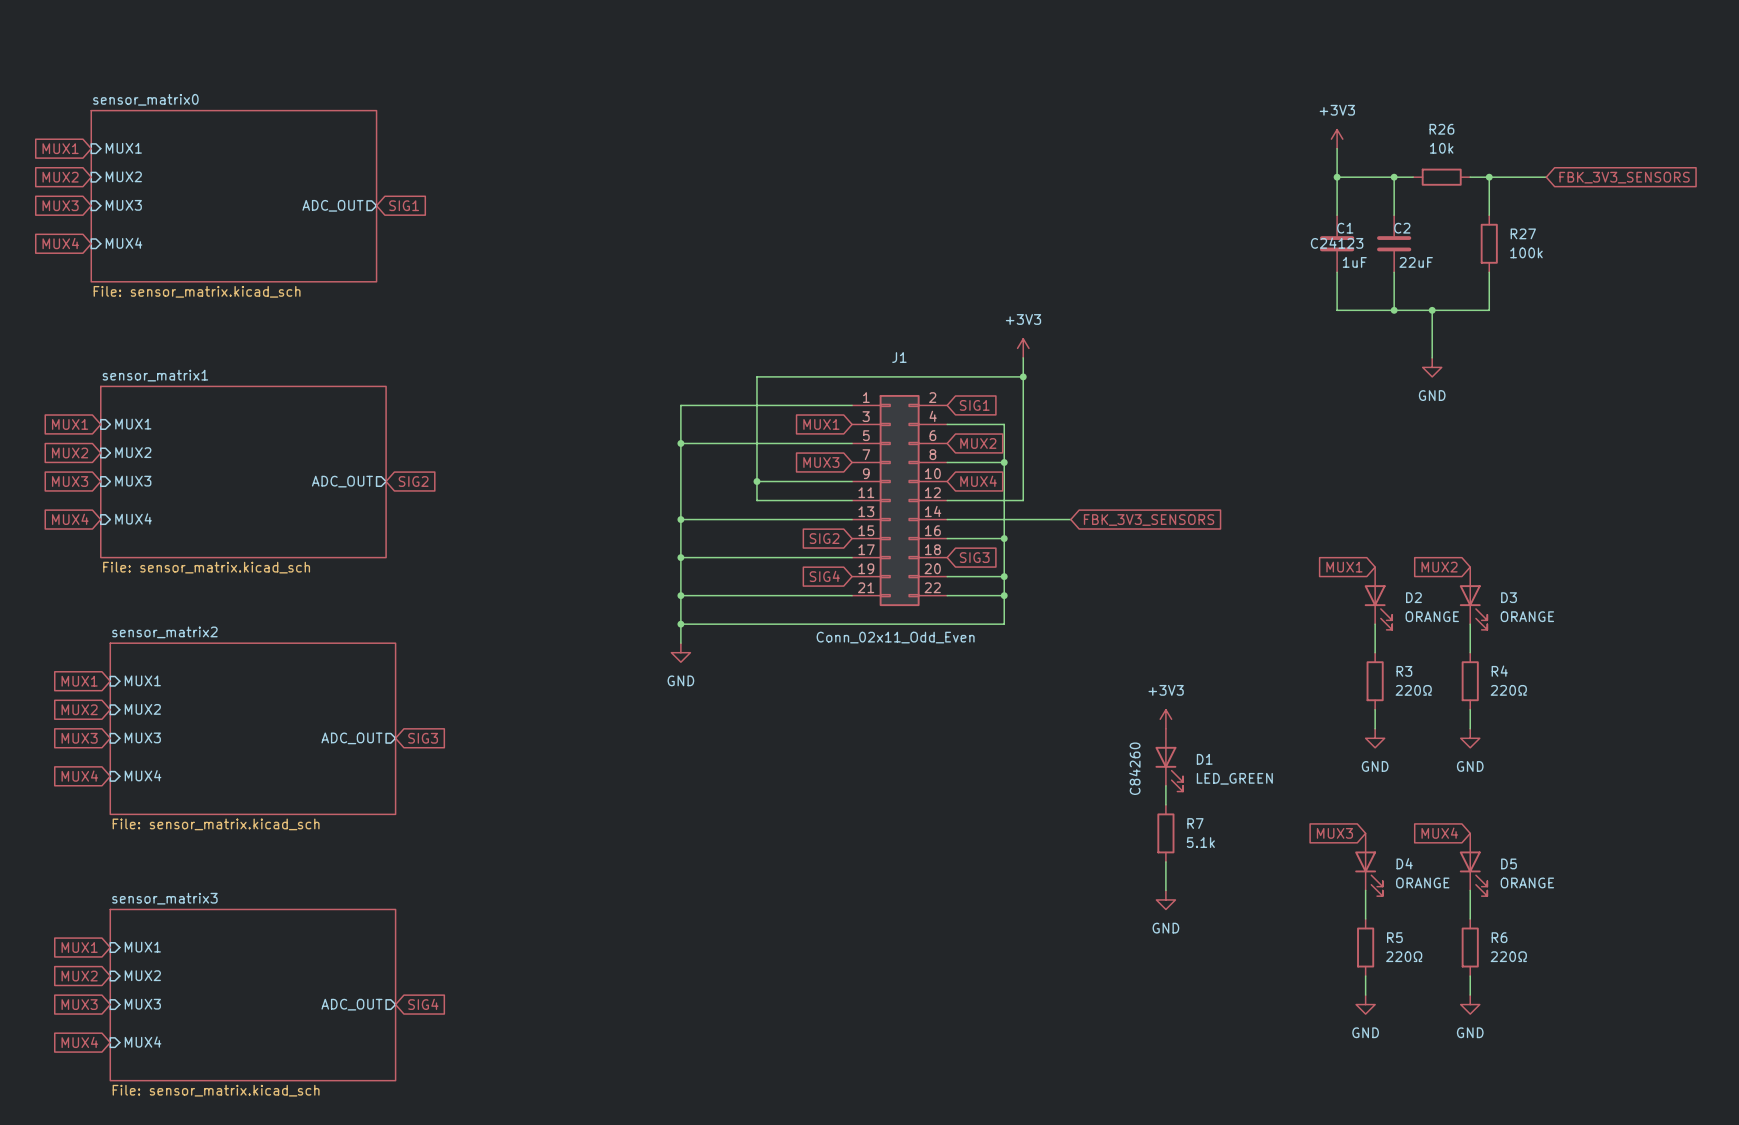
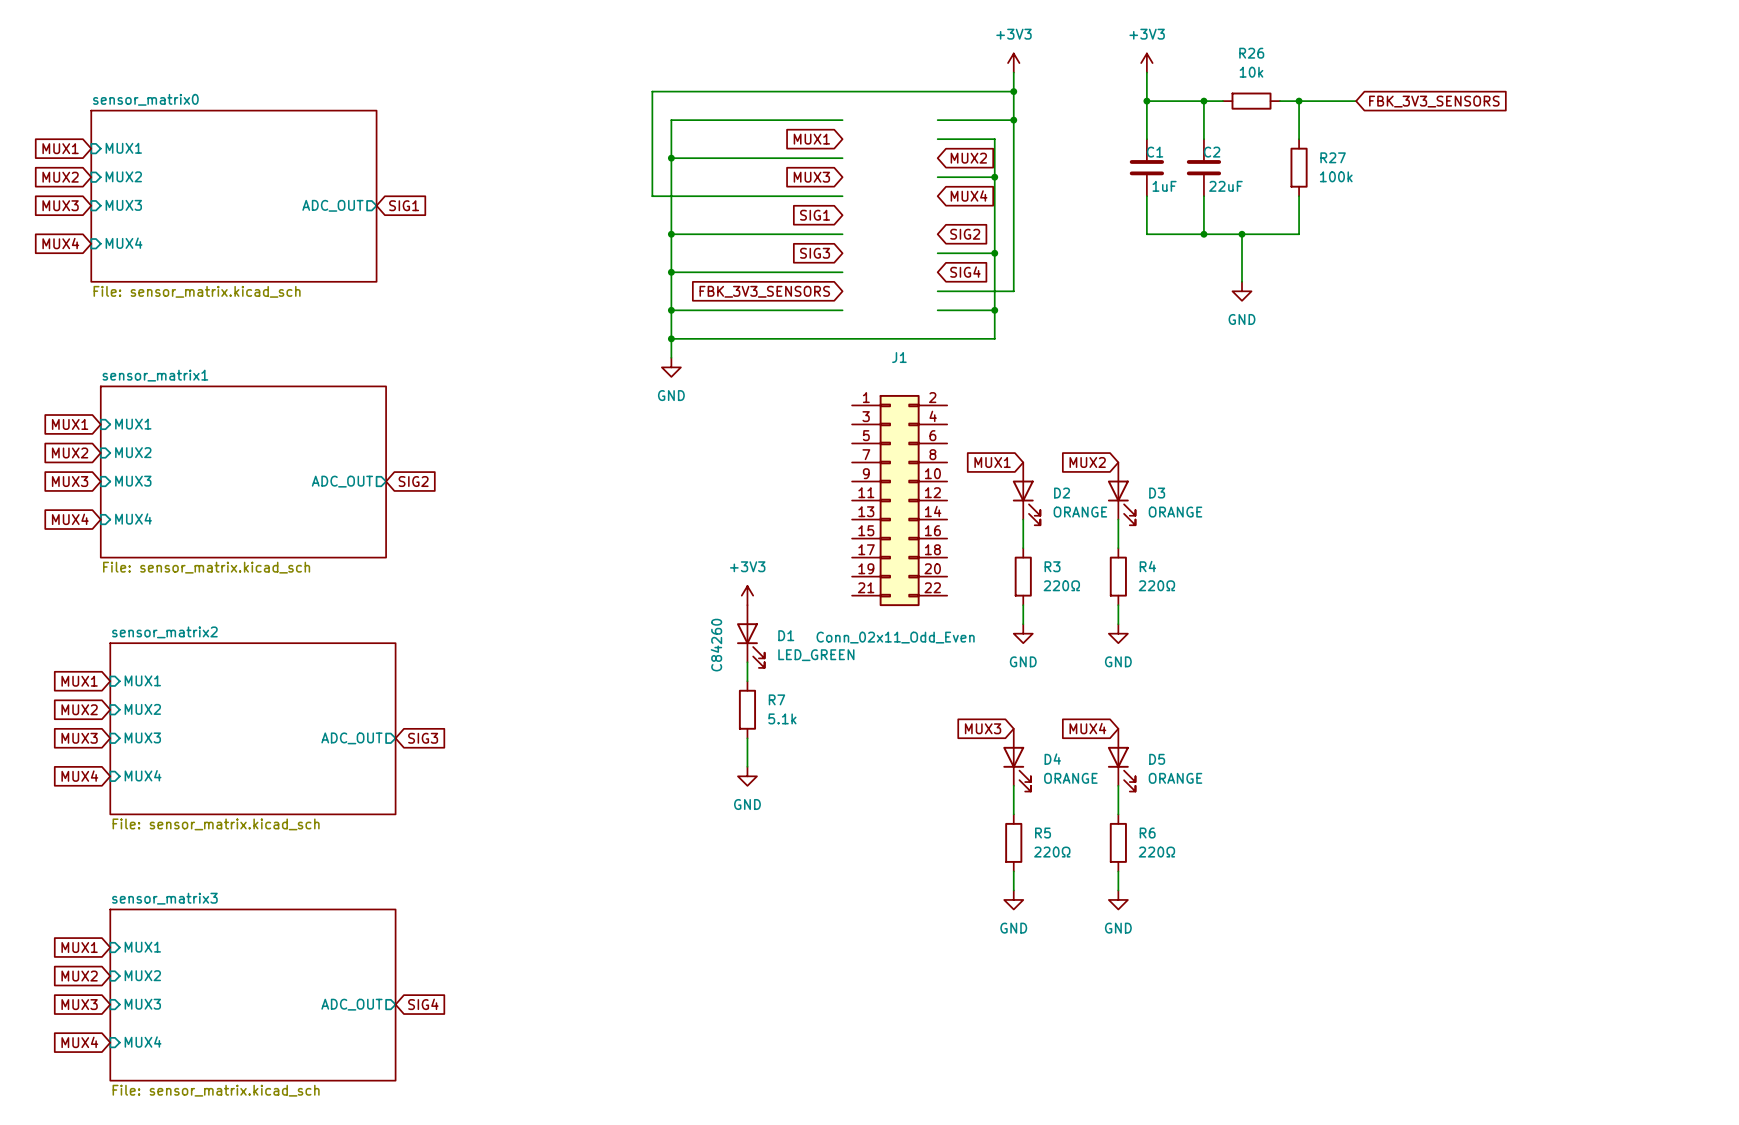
power symbol: none -> +3V3 (1013, 63)
power symbol: none -> +3V3 (1146, 63)
wire: none -> (1013, 72) (1013, 291) (937, 291)
wire: none -> (1146, 72) (1146, 139)
wire: none -> (1013, 91) (652, 91) (652, 196) (842, 196)
junction: none -> (1013, 91)
wire: none -> (1146, 101) (1222, 101)
junction: none -> (1146, 101)
wire: none -> (1203, 101) (1203, 139)
junction: none -> (1203, 101)
junction: none -> (1299, 101)
global label: none -> FBK_3V3_SENSORS (1434, 101)
wire: none -> (842, 120) (671, 120) (671, 357)
wire: none -> (937, 120) (1013, 120)
junction: none -> (1013, 120)
global label: none -> MUX1 (811, 139)
wire: none -> (937, 139) (994, 139) (994, 338) (671, 338)
power symbol: +3V3 (1337, 139) -> none
wire: (1337, 148) (1337, 215) -> none
wire: none -> (671, 158) (842, 158)
junction: none -> (671, 158)
global label: none -> MUX2 (968, 158)
global label: none -> MUX3 (811, 177)
wire: none -> (937, 177) (994, 177)
junction: none -> (994, 177)
wire: (1337, 177) (1413, 177) -> (1280, 101) (1356, 101)
junction: (1337, 177) -> none
wire: (1394, 177) (1394, 215) -> (1299, 101) (1299, 139)
junction: (1394, 177) -> none
R26 position: (1441, 177) -> (1251, 101)
wire: (1470, 177) (1546, 177) -> none
wire: (1489, 177) (1489, 215) -> none
junction: (1489, 177) -> none
global label: FBK_3V3_SENSORS (1624, 177) -> none
global label: none -> MUX4 (969, 195)
wire: none -> (1146, 196) (1146, 234) (1299, 234) (1299, 196)
wire: none -> (1203, 196) (1203, 234)
global label: none -> SIG1 (815, 215)
wire: none -> (671, 234) (842, 234)
junction: none -> (671, 234)
global label: none -> SIG2 (965, 234)
junction: none -> (1203, 234)
wire: none -> (1241, 234) (1241, 281)
junction: none -> (1241, 234)
C1 position: (1337, 243) -> (1146, 167)
C1 text: C24123 (1337, 243) -> none
C2 position: (1394, 243) -> (1203, 167)
R27 position: (1489, 243) -> (1299, 167)
global label: none -> SIG3 (815, 253)
wire: none -> (937, 253) (994, 253)
junction: none -> (994, 253)
wire: none -> (671, 272) (842, 272)
junction: none -> (671, 272)
global label: none -> SIG4 (965, 272)
wire: (1337, 272) (1337, 310) (1489, 310) (1489, 272) -> none
wire: (1394, 272) (1394, 310) -> none
global label: none -> FBK_3V3_SENSORS (764, 291)
power symbol: none -> GND (1241, 291)
junction: none -> (671, 310)
junction: none -> (994, 310)
junction: (1394, 310) -> none
wire: (1432, 310) (1432, 357) -> none
junction: (1432, 310) -> none
junction: none -> (671, 338)
power symbol: +3V3 (1023, 348) -> none
wire: (1023, 357) (1023, 500) (947, 500) -> none
power symbol: none -> GND (671, 367)
power symbol: GND (1432, 367) -> none
wire: (1023, 376) (756, 376) (756, 500) (852, 500) -> none
junction: (1023, 376) -> none
wire: (852, 405) (680, 405) (680, 643) -> none
global label: SIG1 (974, 405) -> none
global label: MUX1 (821, 424) -> none
wire: (947, 424) (1004, 424) (1004, 624) (680, 624) -> none
wire: (680, 443) (852, 443) -> (671, 310) (842, 310)
junction: (680, 443) -> none
global label: MUX2 (978, 443) -> none
global label: MUX3 (821, 462) -> none
wire: (947, 462) (1004, 462) -> (937, 310) (994, 310)
global label: none -> MUX1 (992, 462)
junction: (1004, 462) -> none
global label: none -> MUX2 (1087, 462)
wire: (756, 481) (852, 481) -> none
junction: (756, 481) -> none
global label: MUX4 (978, 481) -> none
wire: (680, 519) (852, 519) -> none
junction: (680, 519) -> none
wire: (947, 519) (1070, 519) -> none
wire: none -> (1023, 519) (1023, 548)
wire: none -> (1118, 519) (1118, 548)
global label: FBK_3V3_SENSORS (1149, 520) -> none
global label: SIG2 (824, 538) -> none
wire: (947, 538) (1004, 538) -> none
junction: (1004, 538) -> none
wire: (680, 557) (852, 557) -> none
junction: (680, 557) -> none
global label: SIG3 (974, 557) -> none
global label: MUX1 (1344, 567) -> none
global label: MUX2 (1439, 567) -> none
global label: SIG4 (824, 576) -> none
wire: (947, 576) (1004, 576) -> none
junction: (1004, 576) -> none
wire: (680, 595) (852, 595) -> none
junction: (680, 595) -> none
power symbol: none -> +3V3 (747, 595)
wire: (947, 595) (1004, 595) -> none
junction: (1004, 595) -> none
D2 position: (1378, 598) -> (1026, 493)
D3 position: (1473, 598) -> (1121, 493)
wire: none -> (1023, 605) (1023, 624)
wire: none -> (1118, 605) (1118, 624)
junction: (680, 624) -> none
wire: (1375, 624) (1375, 652) -> none
wire: (1470, 624) (1470, 652) -> none
power symbol: none -> GND (1023, 633)
power symbol: none -> GND (1118, 633)
power symbol position: GND (680, 652) -> GND (747, 776)
wire: none -> (747, 662) (747, 681)
R3 position: (1375, 681) -> (1023, 576)
R4 position: (1470, 681) -> (1118, 576)
wire: (1375, 709) (1375, 728) -> none
wire: (1470, 709) (1470, 728) -> none
power symbol: +3V3 (1165, 719) -> none
global label: none -> MUX3 (983, 728)
global label: none -> MUX4 (1087, 728)
wire: none -> (747, 738) (747, 766)
power symbol: GND (1375, 738) -> none
power symbol: GND (1470, 738) -> none
D1 position: (1169, 760) -> (750, 636)
wire: none -> (1013, 785) (1013, 814)
wire: (1165, 785) (1165, 804) -> (1118, 871) (1118, 890)
R7 position: (1165, 833) -> (747, 709)
global label: MUX3 (1334, 833) -> none
global label: MUX4 (1439, 833) -> none
wire: (1165, 861) (1165, 890) -> (1118, 785) (1118, 814)
D4 position: (1368, 864) -> (1017, 760)
D5 position: (1473, 864) -> (1121, 760)
wire: none -> (1013, 871) (1013, 890)
wire: (1365, 890) (1365, 918) -> none
wire: (1470, 890) (1470, 918) -> none
power symbol: none -> GND (1013, 899)
power symbol position: GND (1165, 899) -> GND (1118, 899)
R5 position: (1365, 947) -> (1013, 842)
R6 position: (1470, 947) -> (1118, 842)
wire: (1365, 976) (1365, 995) -> none
wire: (1470, 976) (1470, 995) -> none
power symbol: GND (1365, 1004) -> none
power symbol: GND (1470, 1004) -> none

